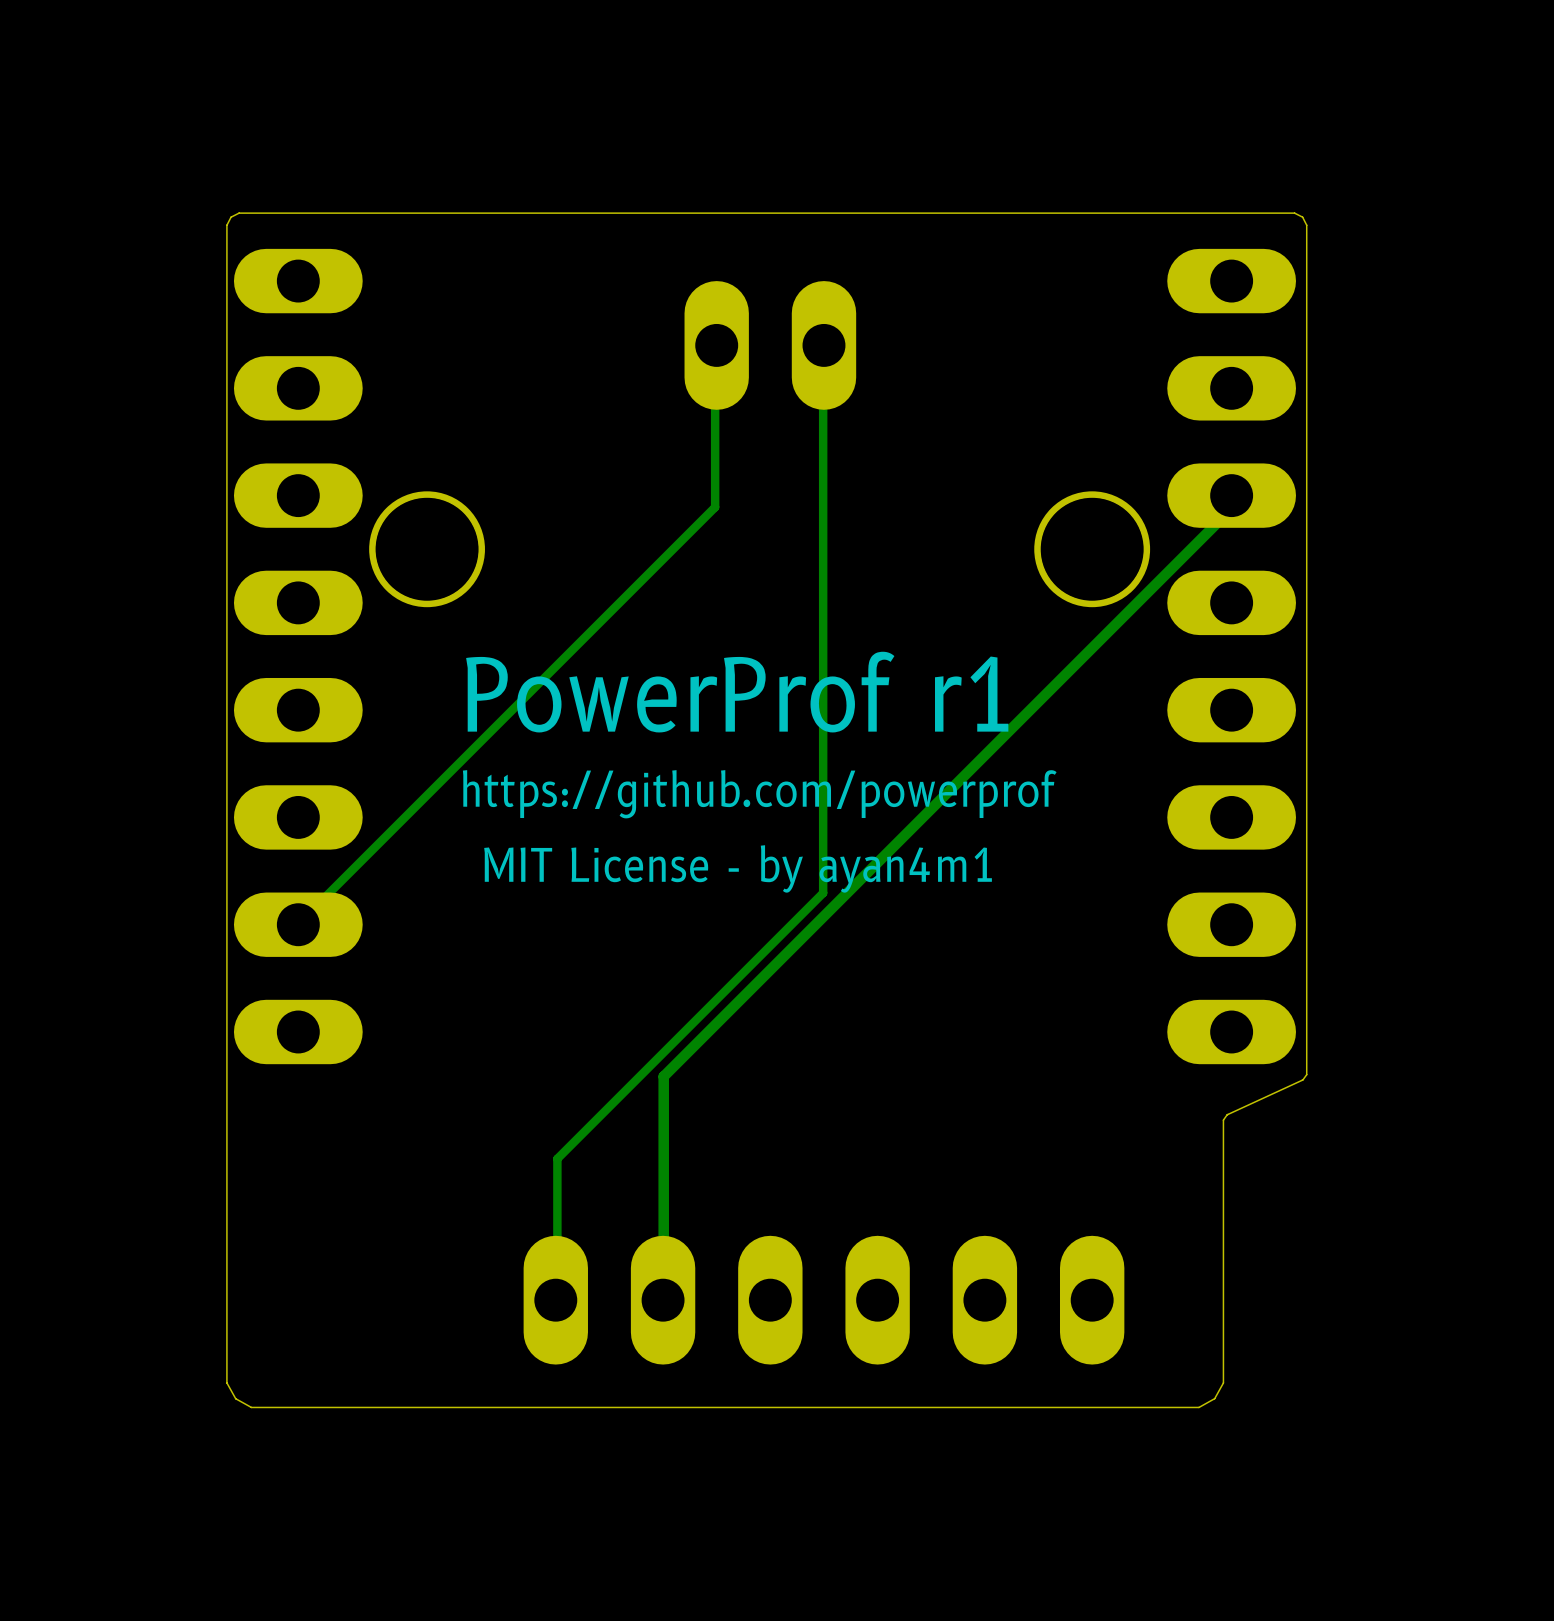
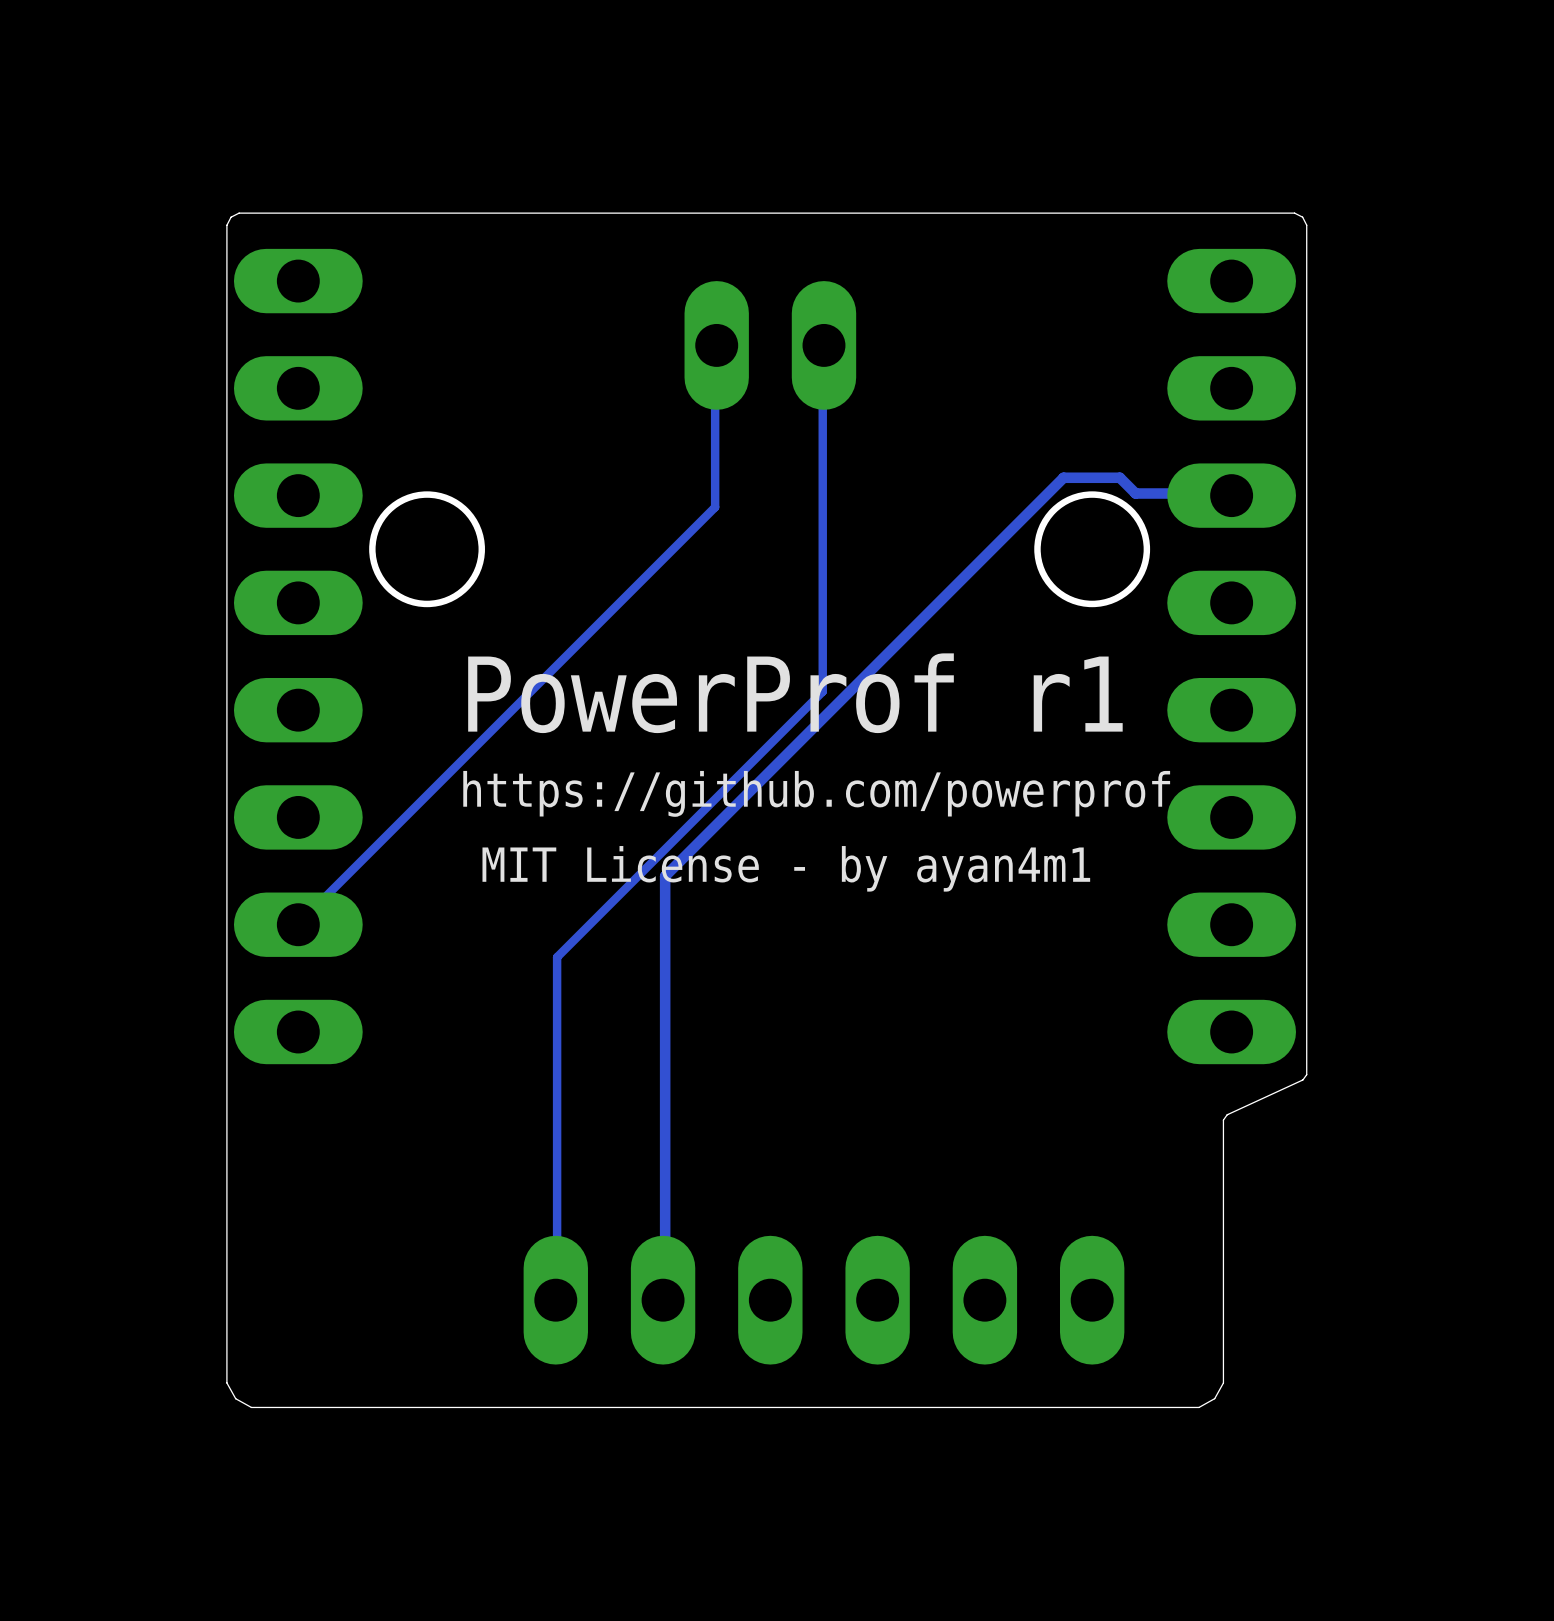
track: (823, 345) (823, 893) (557, 1158) (557, 1299) (555, 1300) -> (823, 345) (822, 691) (557, 957) (555, 1300)
track: (1231, 495) (1231, 508) (663, 1076) (663, 1300) -> (1231, 495) (1230, 493) (1135, 493) (1119, 477) (1063, 477) (665, 876) (665, 1299) (663, 1300)

